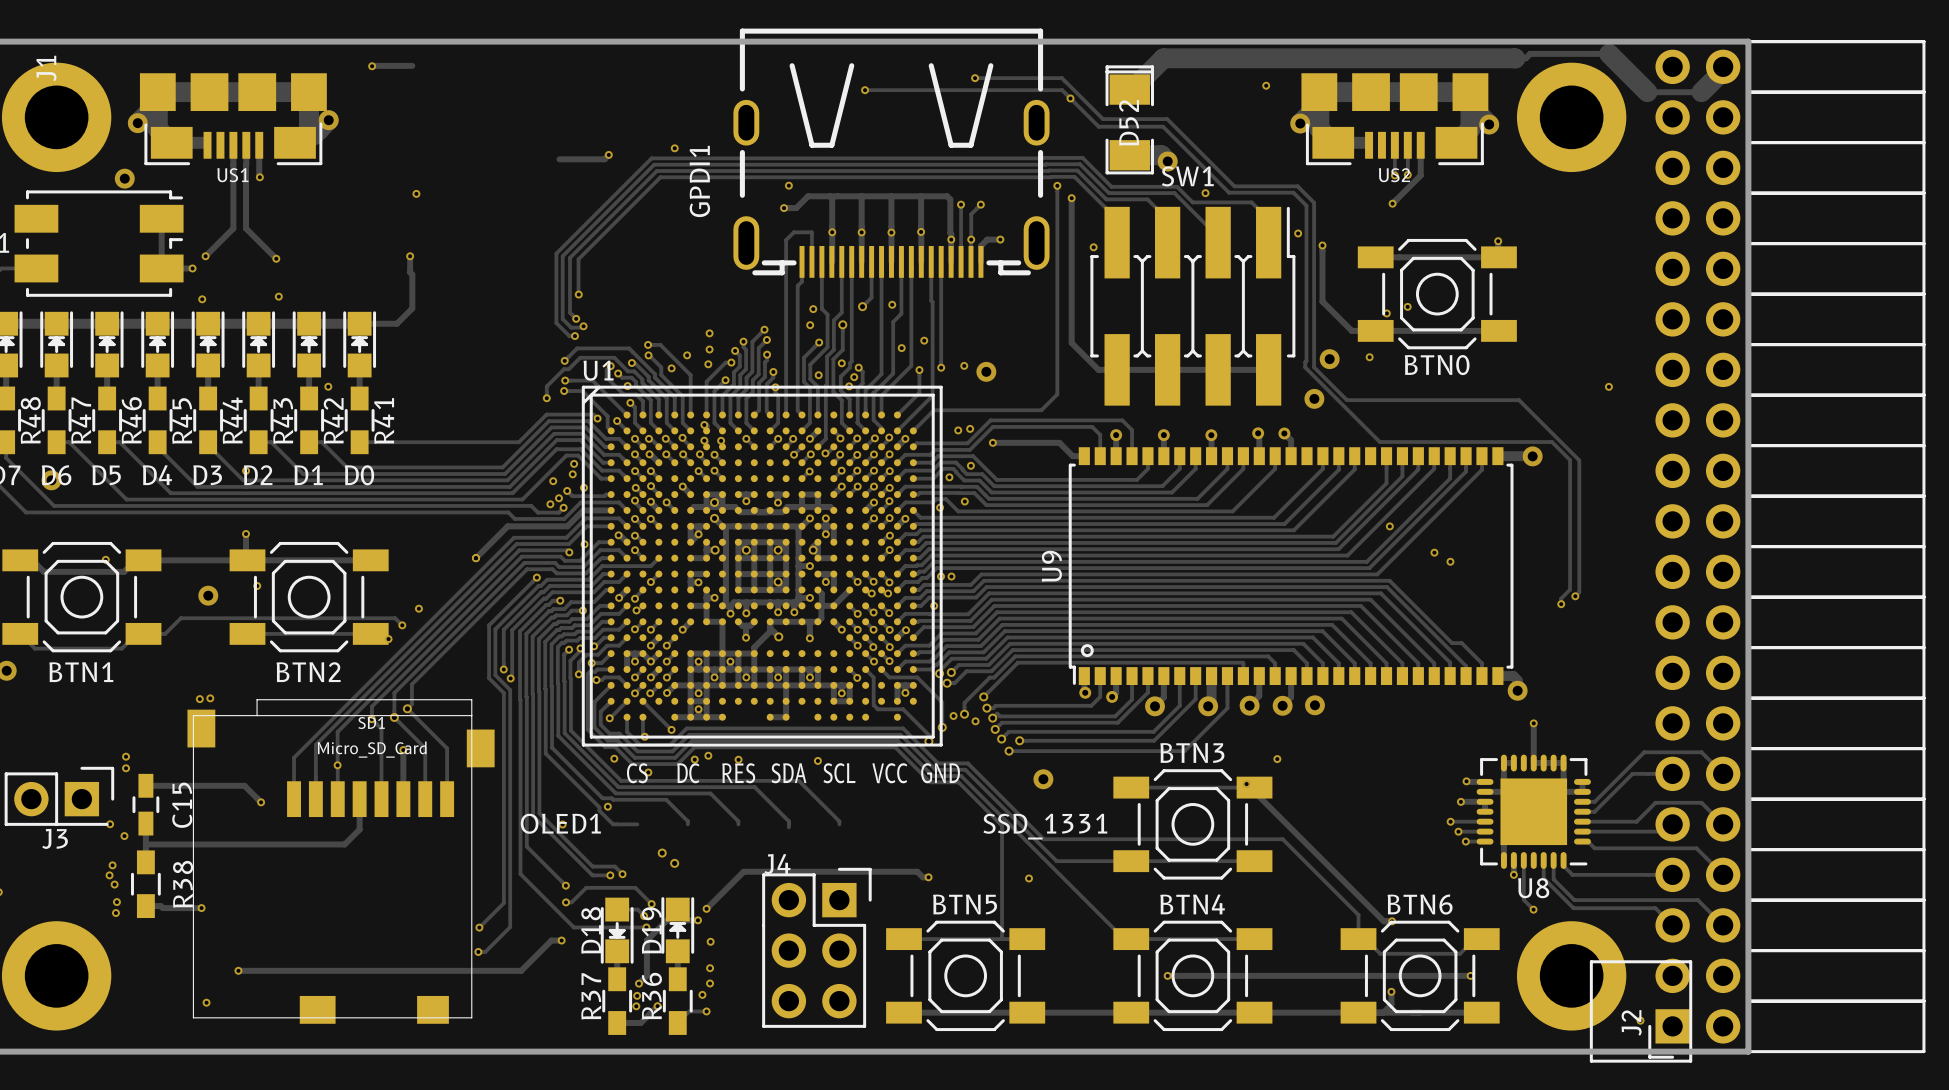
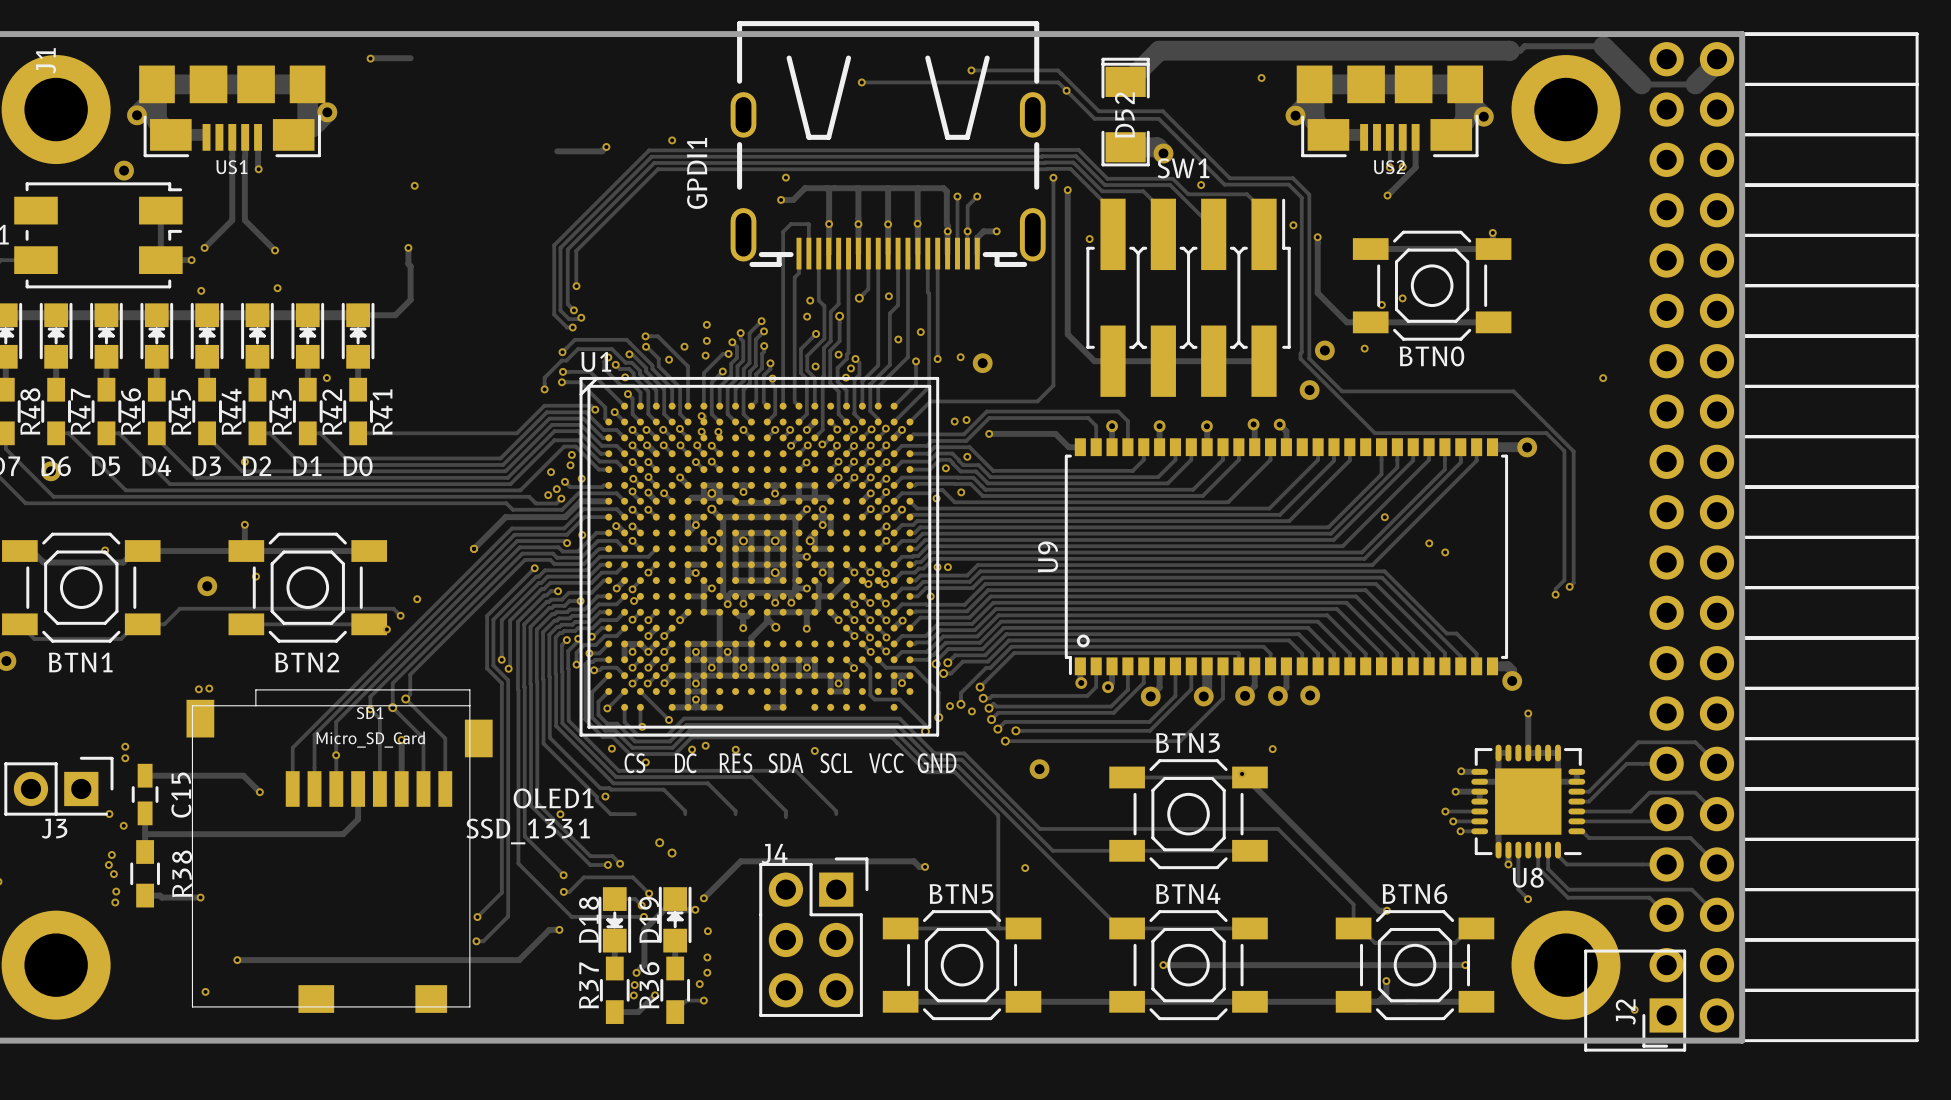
OLED1 name position: OLED1 (560, 823) -> OLED1 (553, 798)
OLED1 value position: SSD_1331 (1045, 826) -> SSD_1331 (528, 831)

